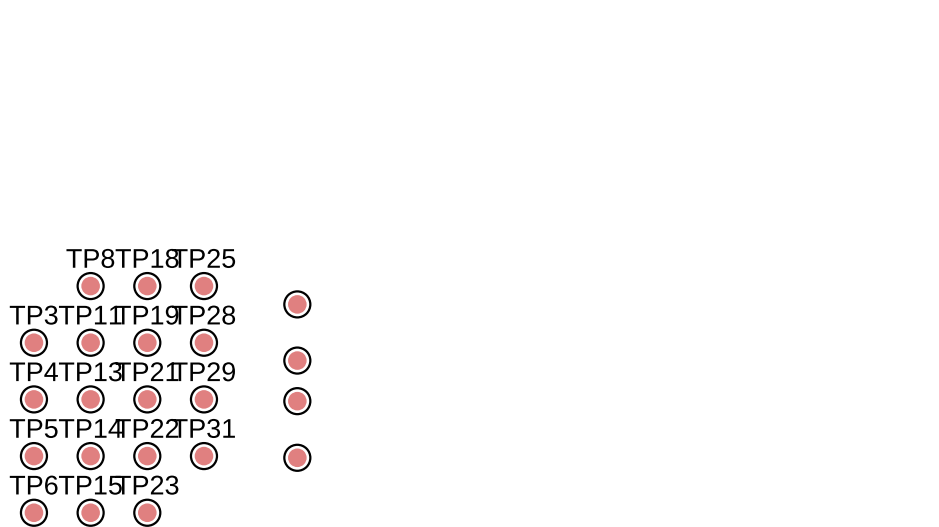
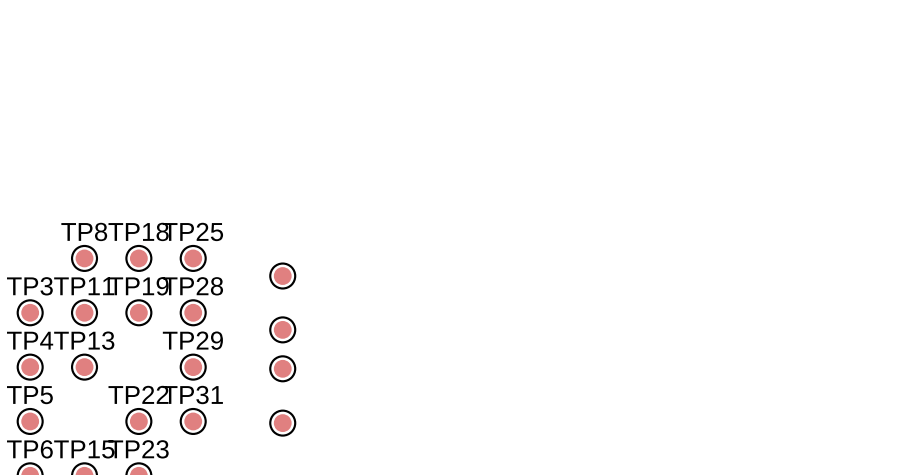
TP21: (147, 399) -> none
TP14: (90, 456) -> none

